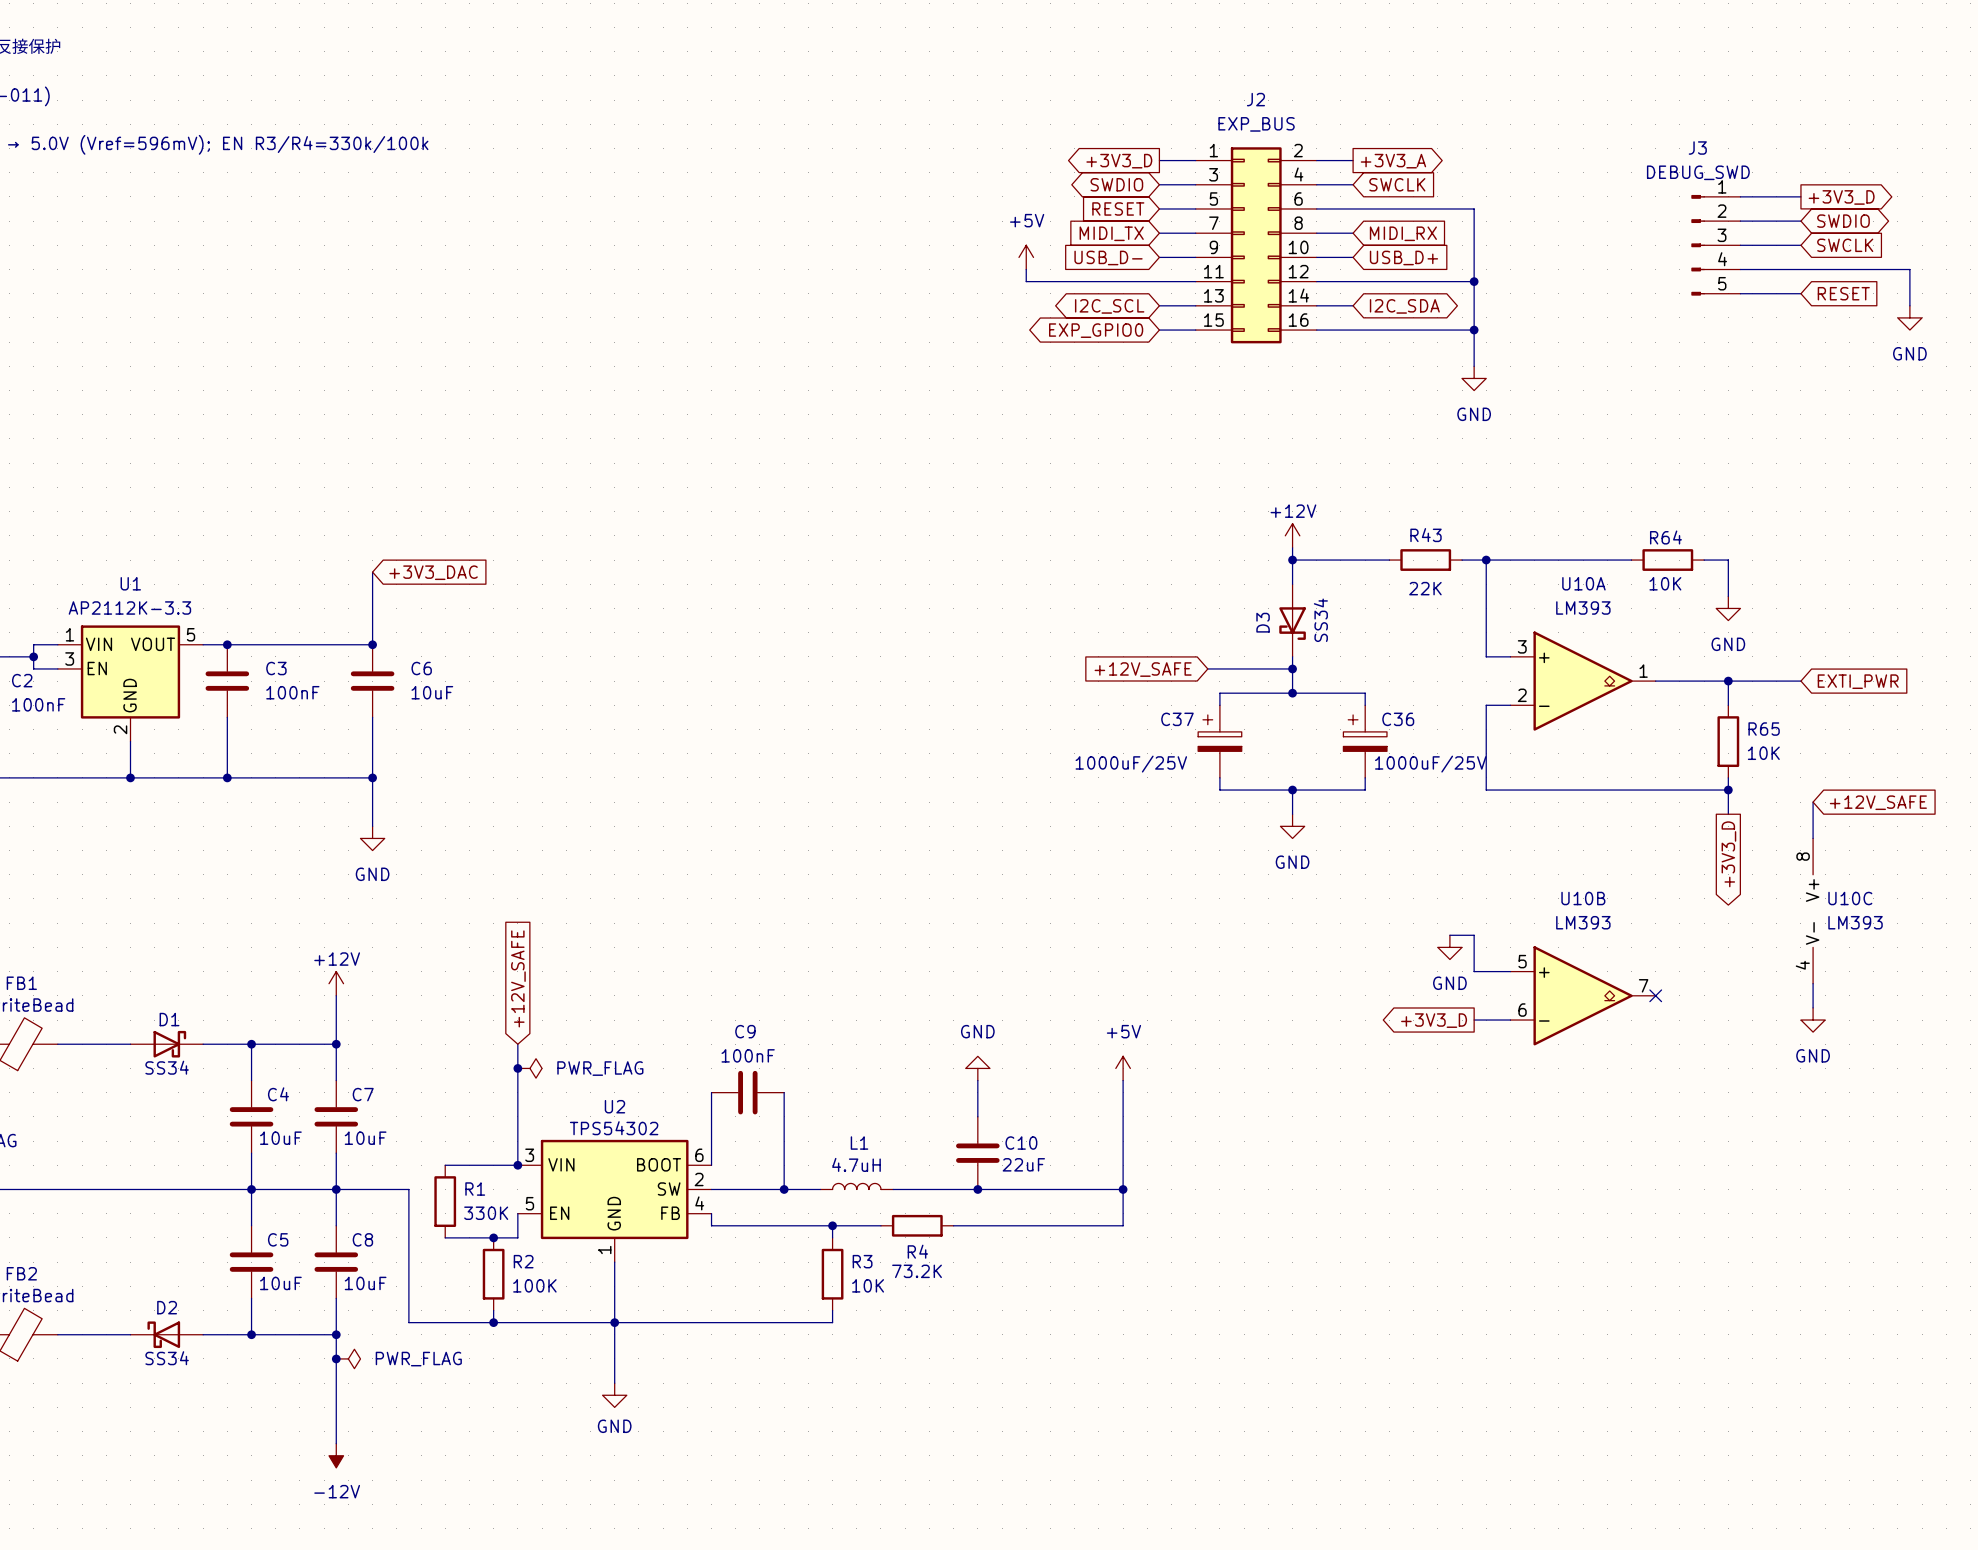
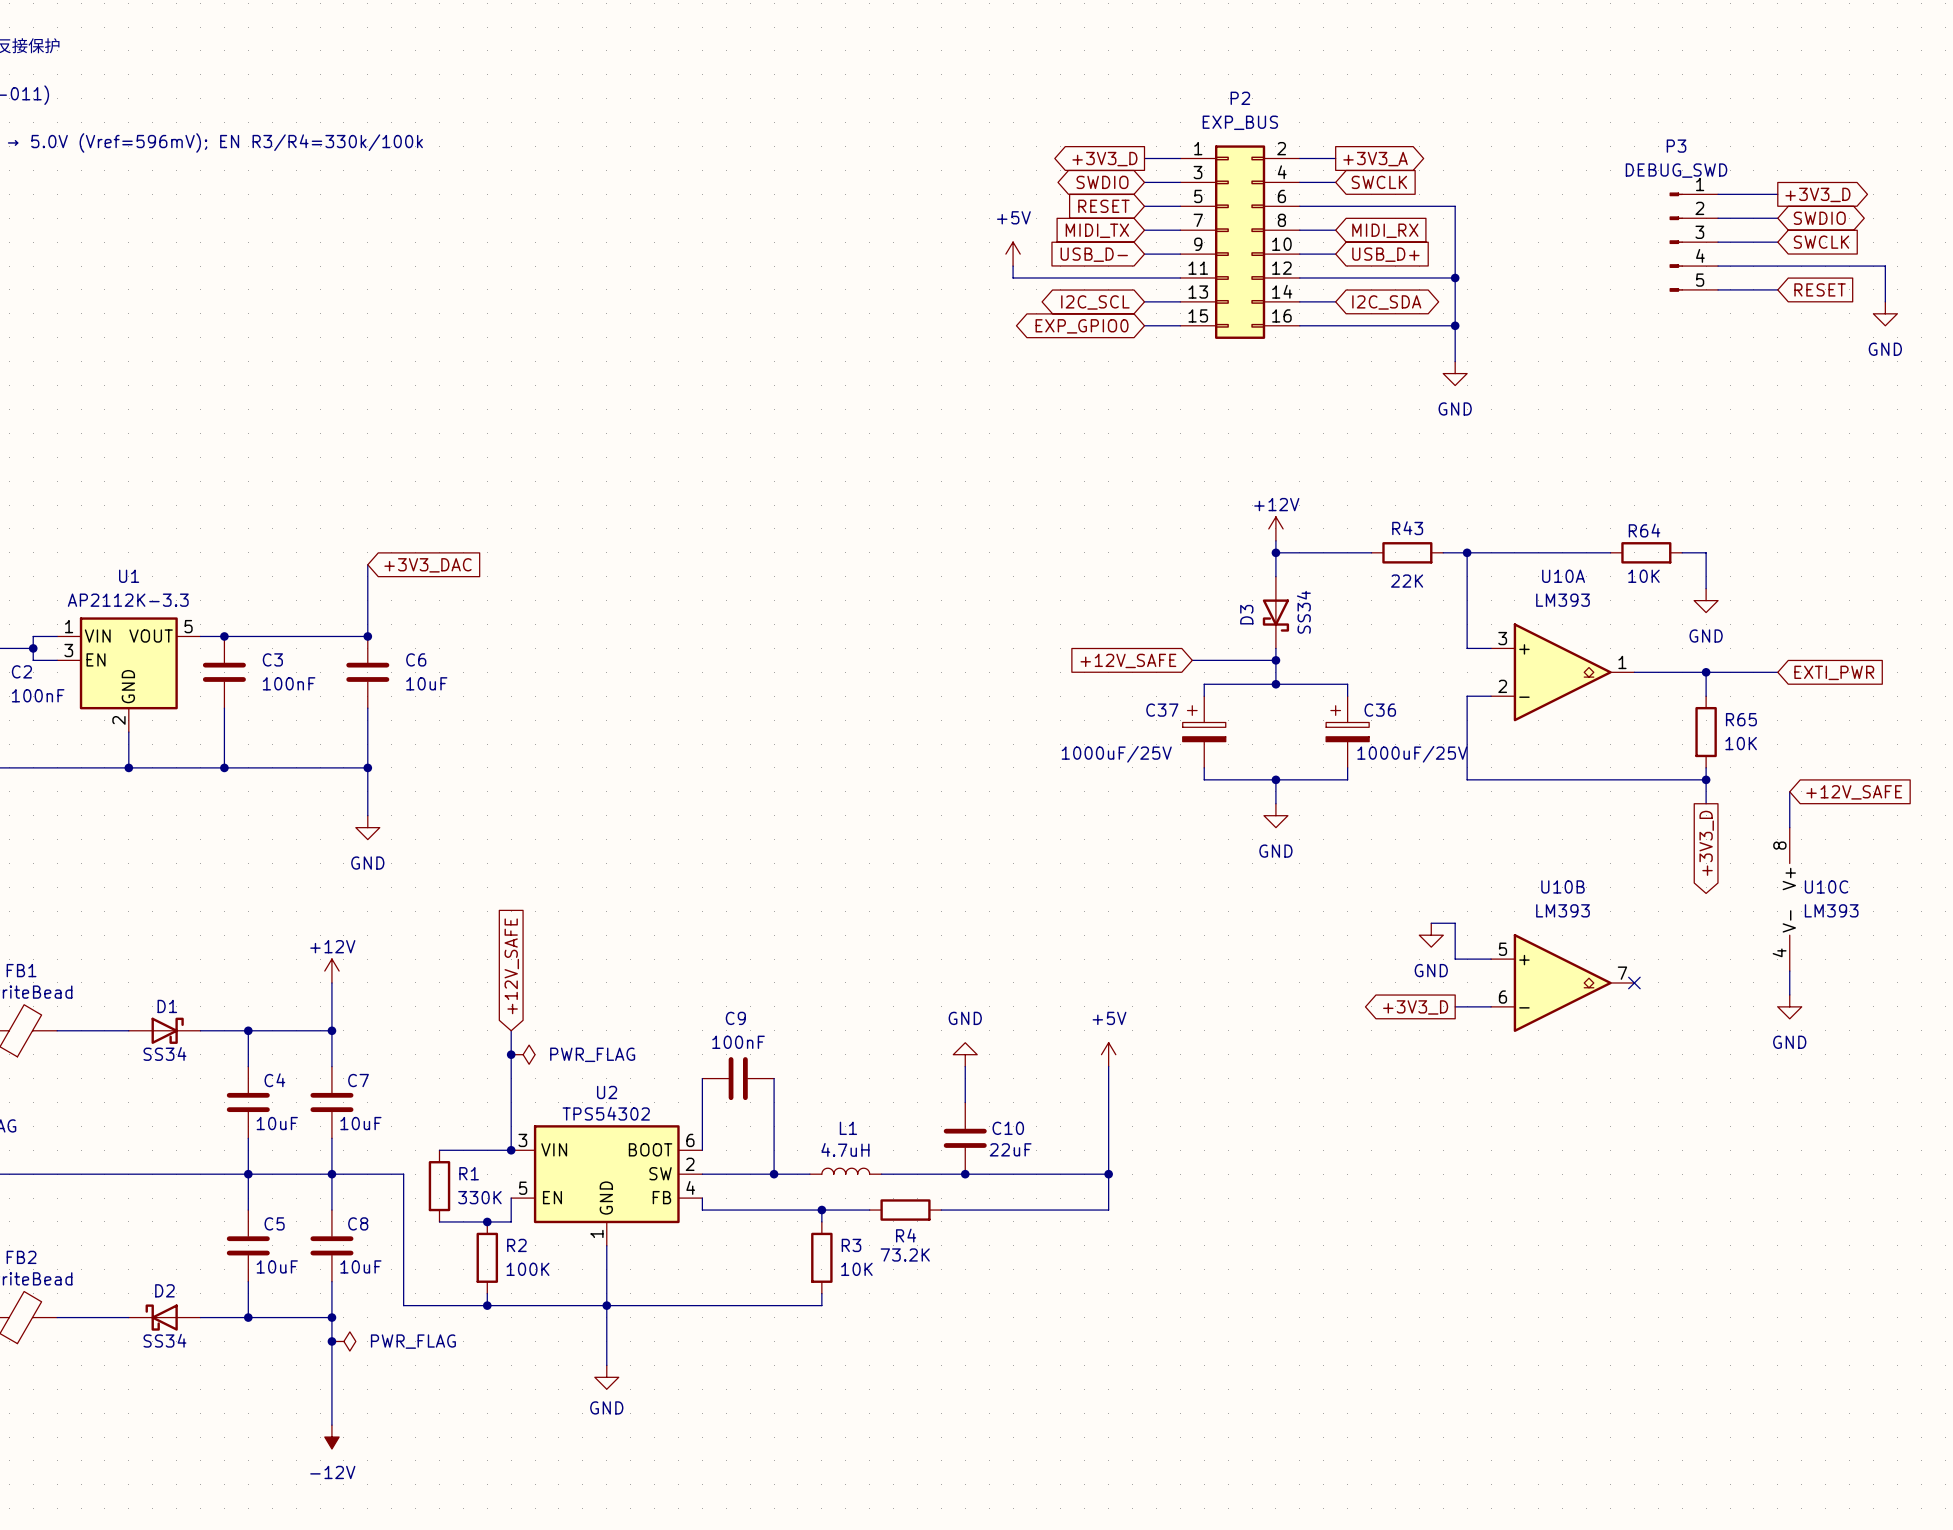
J2 name: J2 (1255, 99) -> P2 (1240, 98)
J3 name: J3 (1697, 148) -> P3 (1676, 146)

